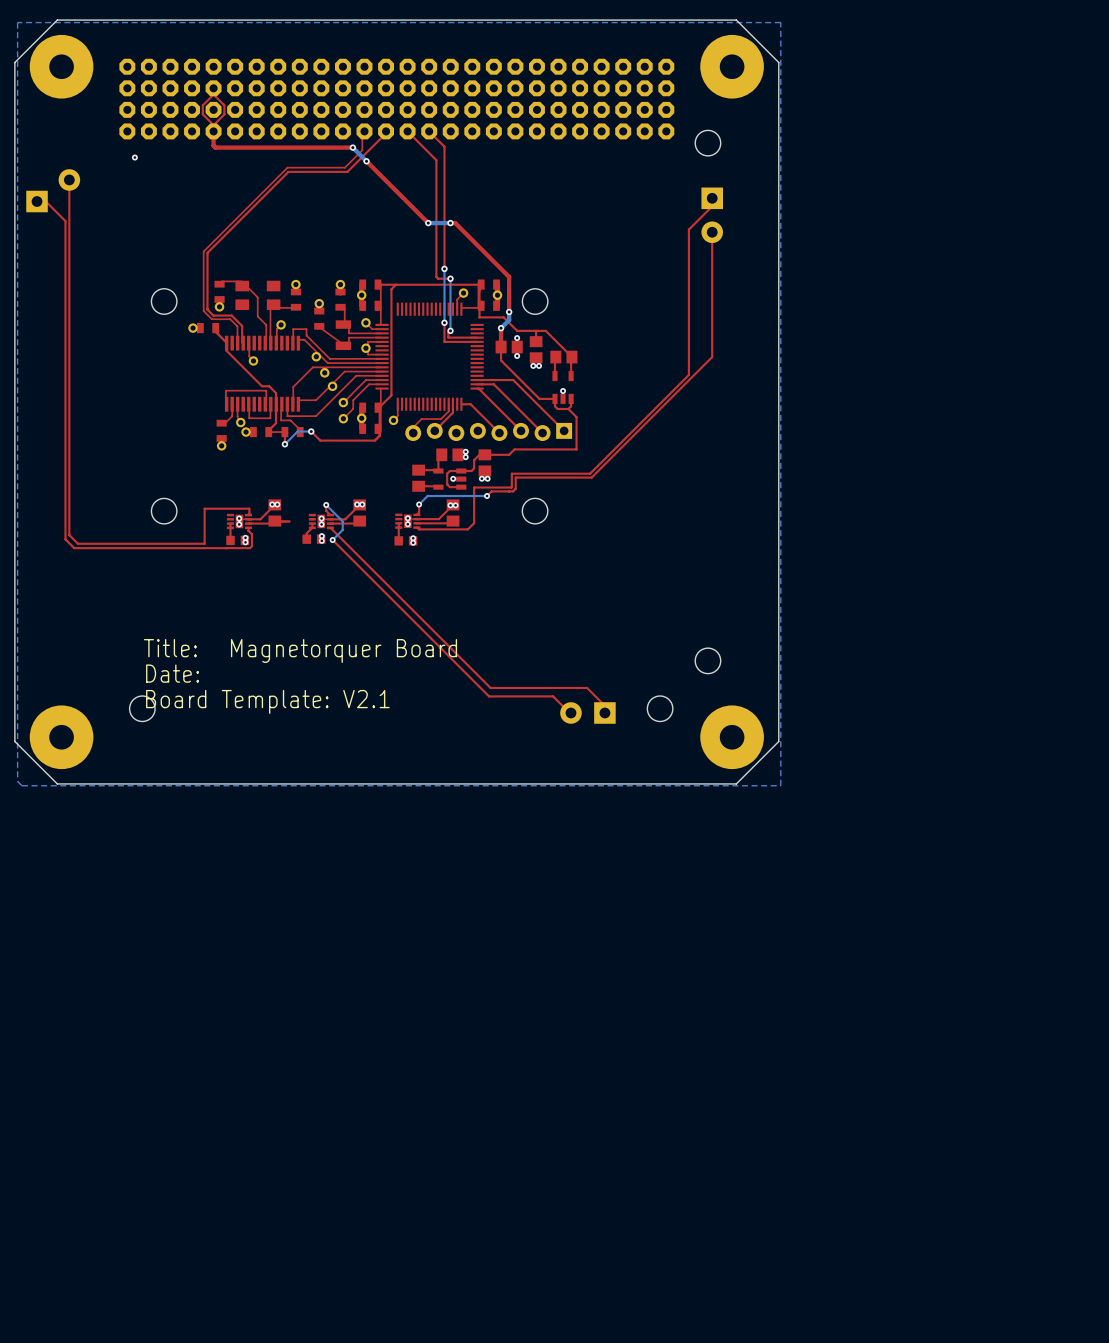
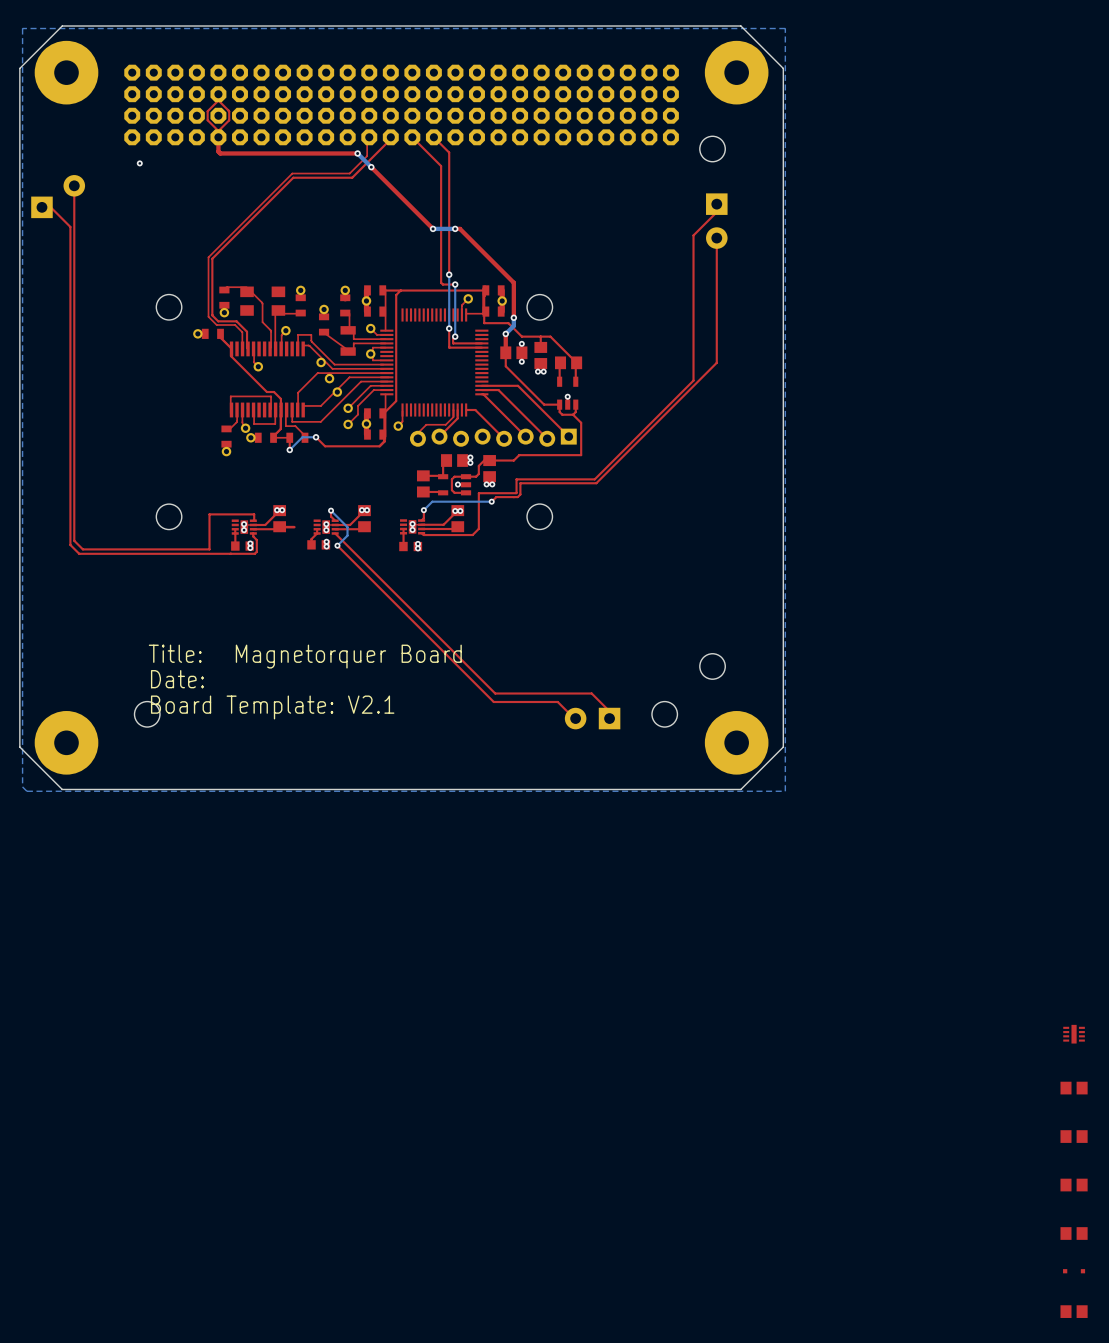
part: none -> (1074, 1034)
part: none -> (1074, 1088)
part: none -> (1074, 1136)
part: none -> (1074, 1185)
part: none -> (1074, 1233)
part: none -> (1074, 1271)
part: none -> (1074, 1311)

